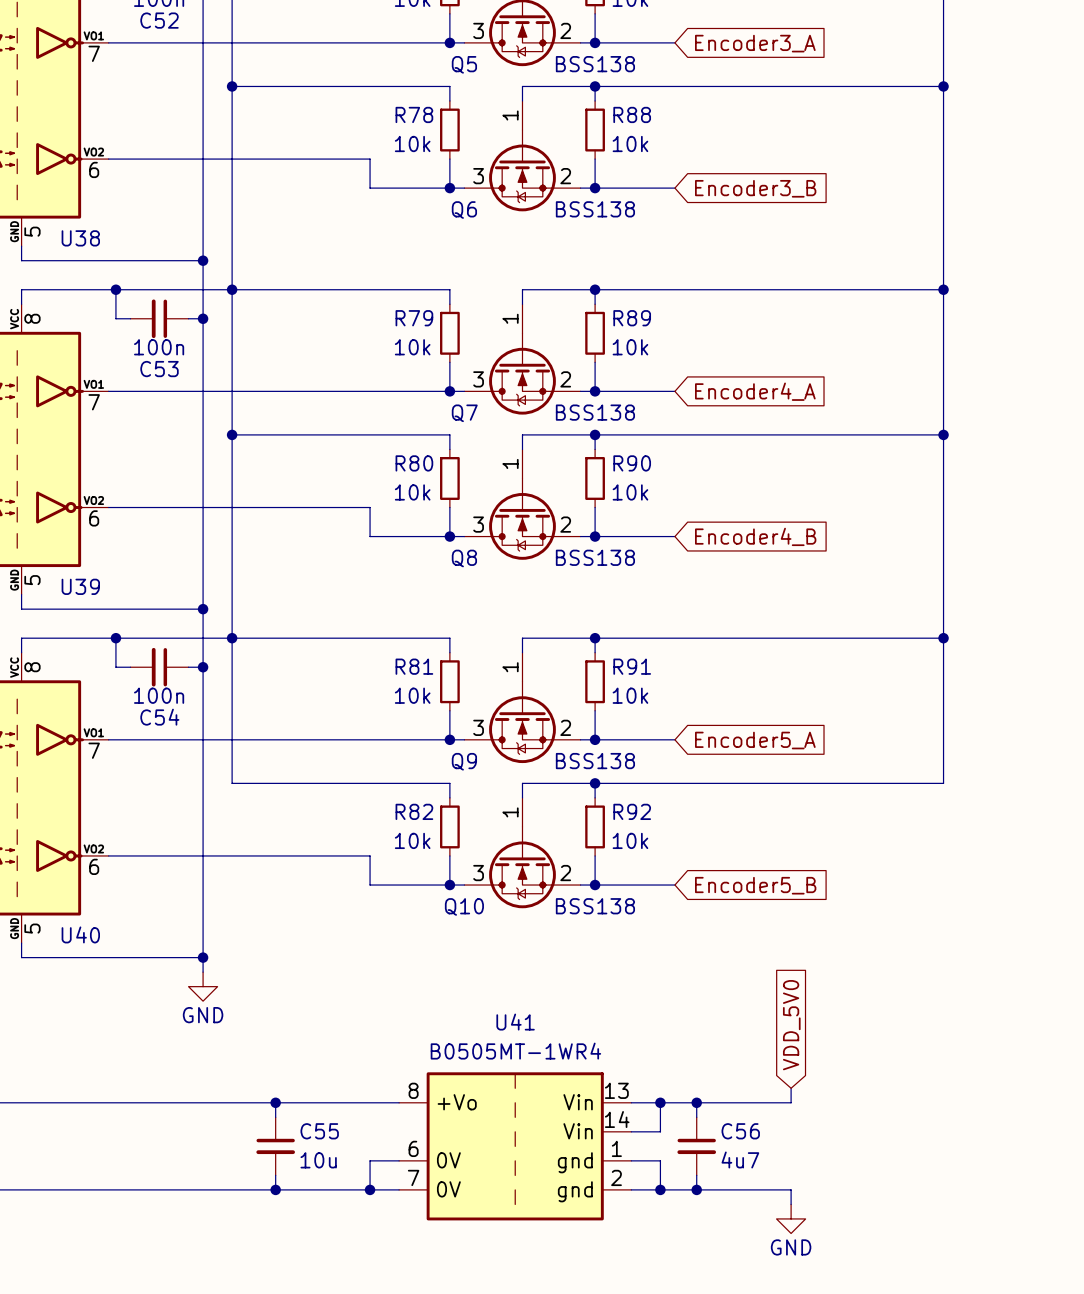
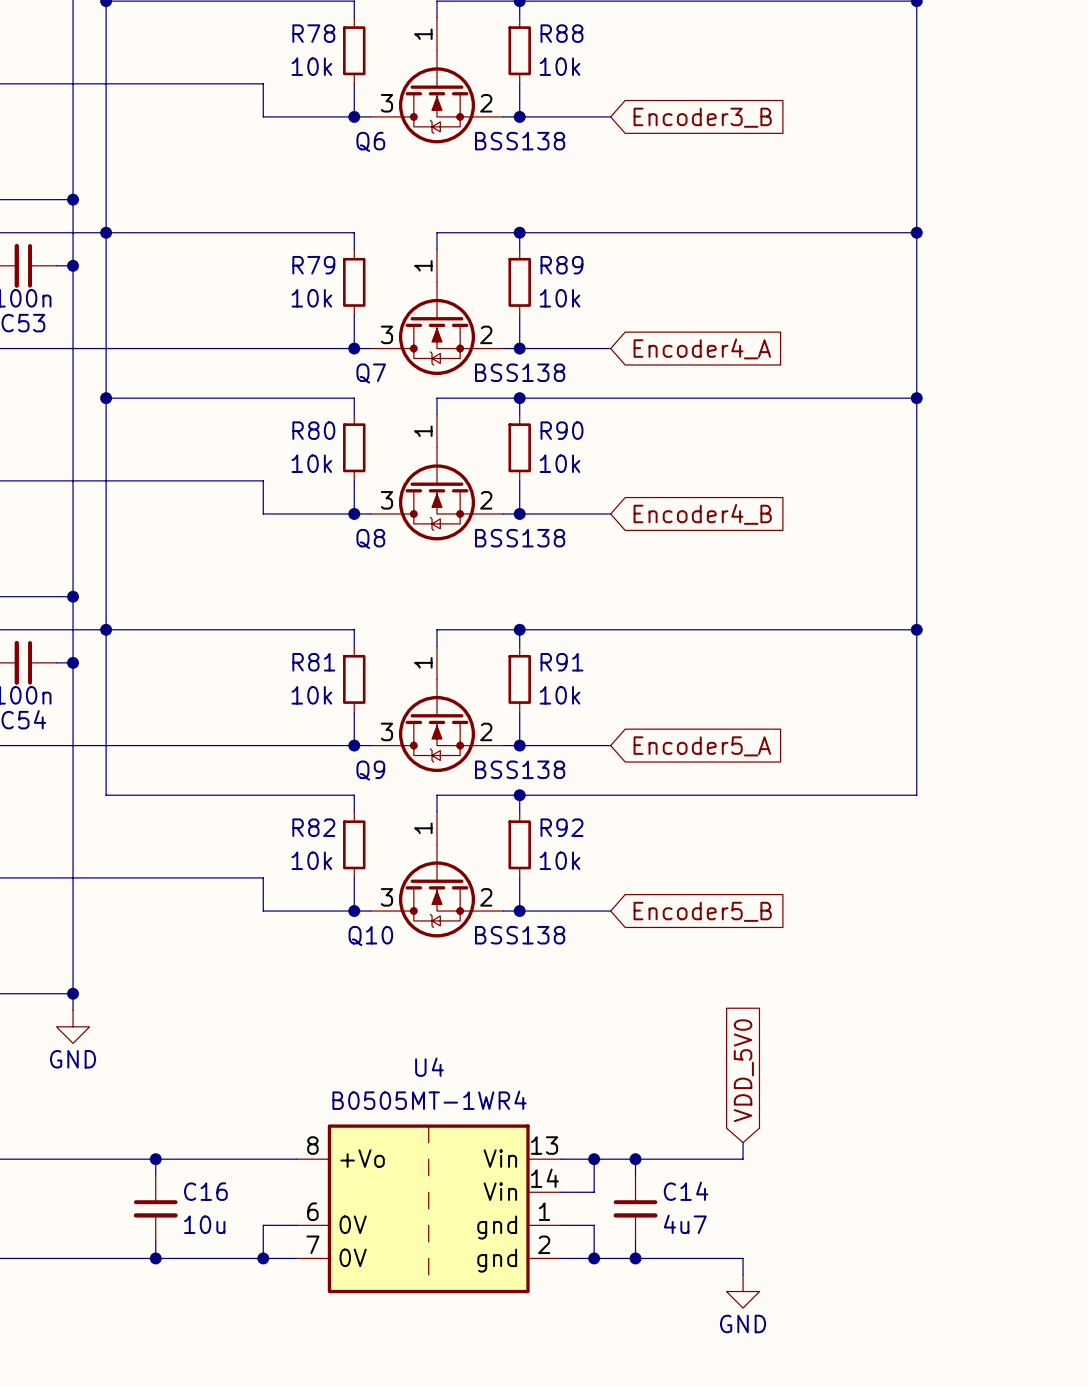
U41 name: U41 (515, 1022) -> U4 (429, 1067)
C55 name: C55 (319, 1131) -> C16 (205, 1191)
C56 name: C56 (740, 1131) -> C14 (686, 1191)

